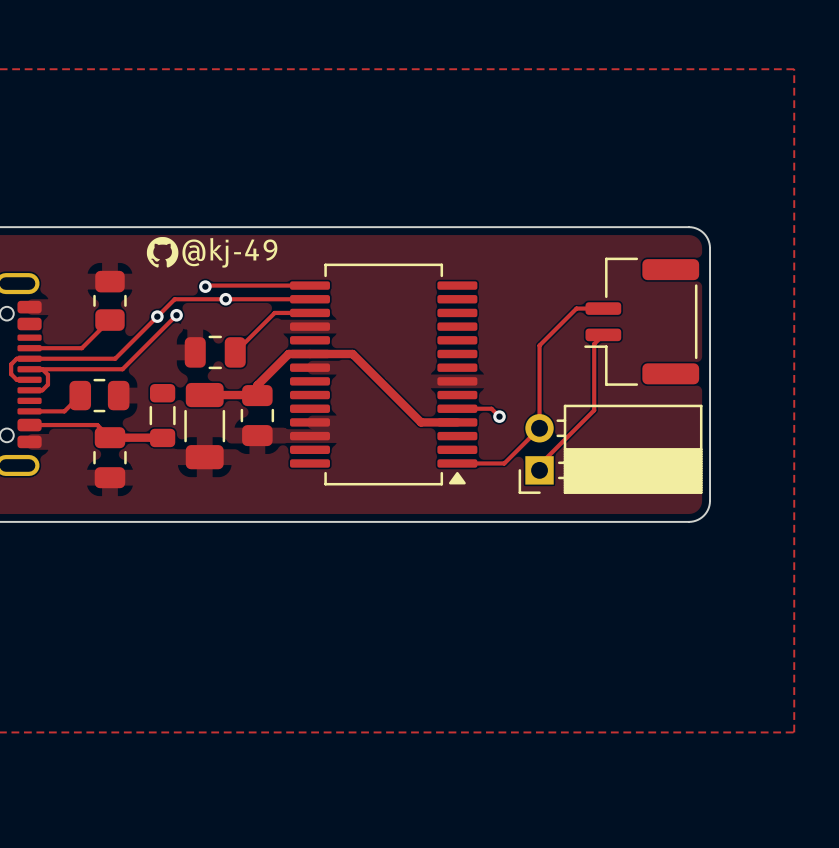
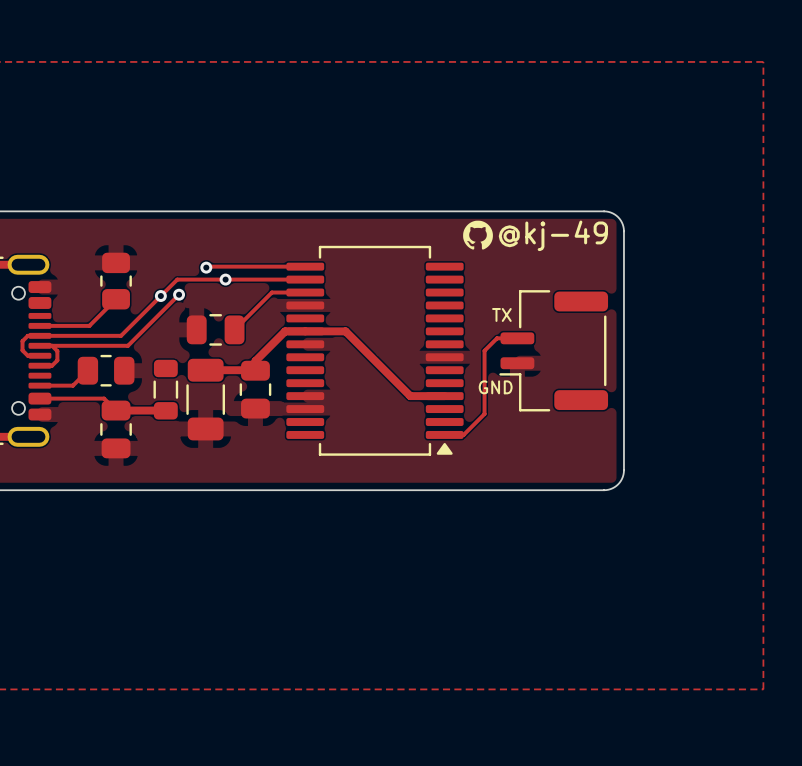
board edge: (625, 227) (693, 227) (705, 235) (710, 248) (708, 507) (702, 517) (691, 521) (625, 521) -> (604, 211) (618, 217) (623, 231) (623, 472) (616, 485) (604, 490)
drawing position: (162, 252) -> (478, 235)
text position: @kj-49 (229, 252) -> @kj-49 (553, 235)
track: (603, 308) (576, 308) (539, 345) (539, 428) (504, 463) (477, 463) -> (517, 338) (496, 338) (484, 350) (484, 414) (463, 434)
part position: (641, 321) -> (553, 350)
track: (603, 334) (594, 344) (594, 410) (535, 469) -> none
text: none -> TX (501, 314)
track: (457, 408) (491, 408) (499, 416) -> none
text: none -> GND (495, 387)
via: (499, 416) -> none
part: (610, 449) -> none

